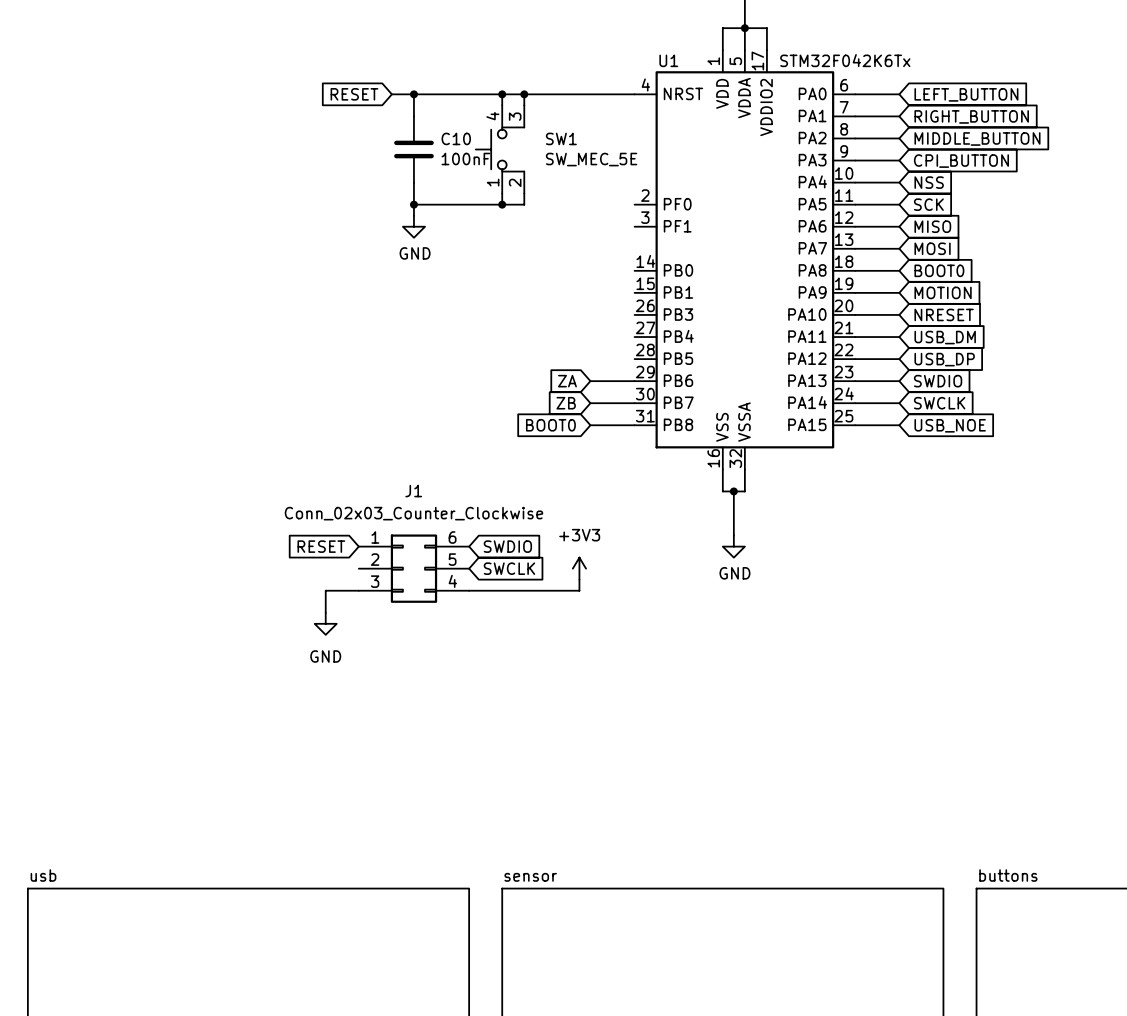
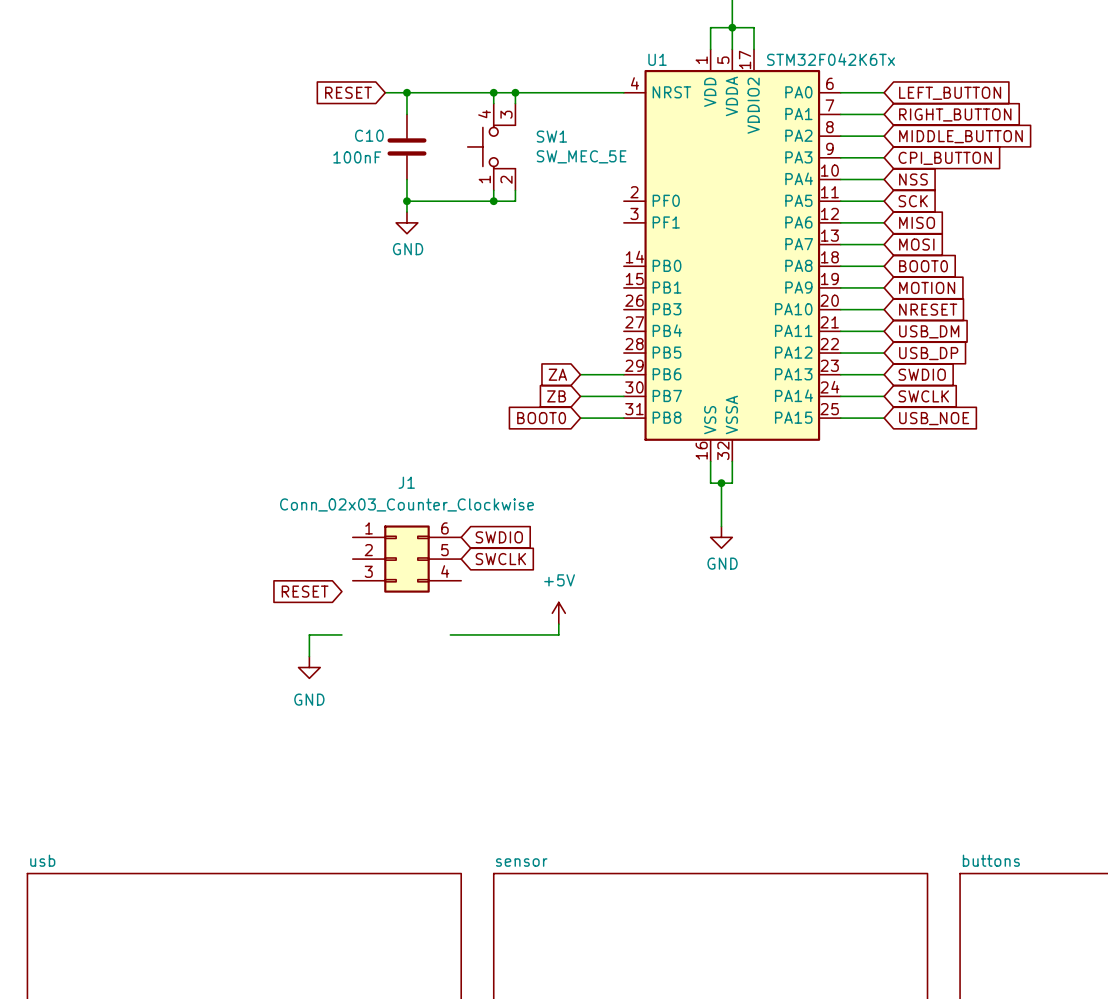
C10 name position: C10 (456, 138) -> C10 (369, 135)
C10 value position: 100nF (465, 159) -> 100nF (357, 157)
global label position: RESET (321, 546) -> RESET (305, 591)
power symbol: +3V3 (579, 568) -> none
wire: (579, 579) (579, 590) (469, 590) -> (558, 624) (558, 634) (450, 634)
wire: (358, 590) (325, 590) (325, 612) -> (341, 634) (309, 634) (309, 656)
power symbol position: GND (325, 623) -> GND (309, 667)
power symbol: none -> +5V (558, 613)

